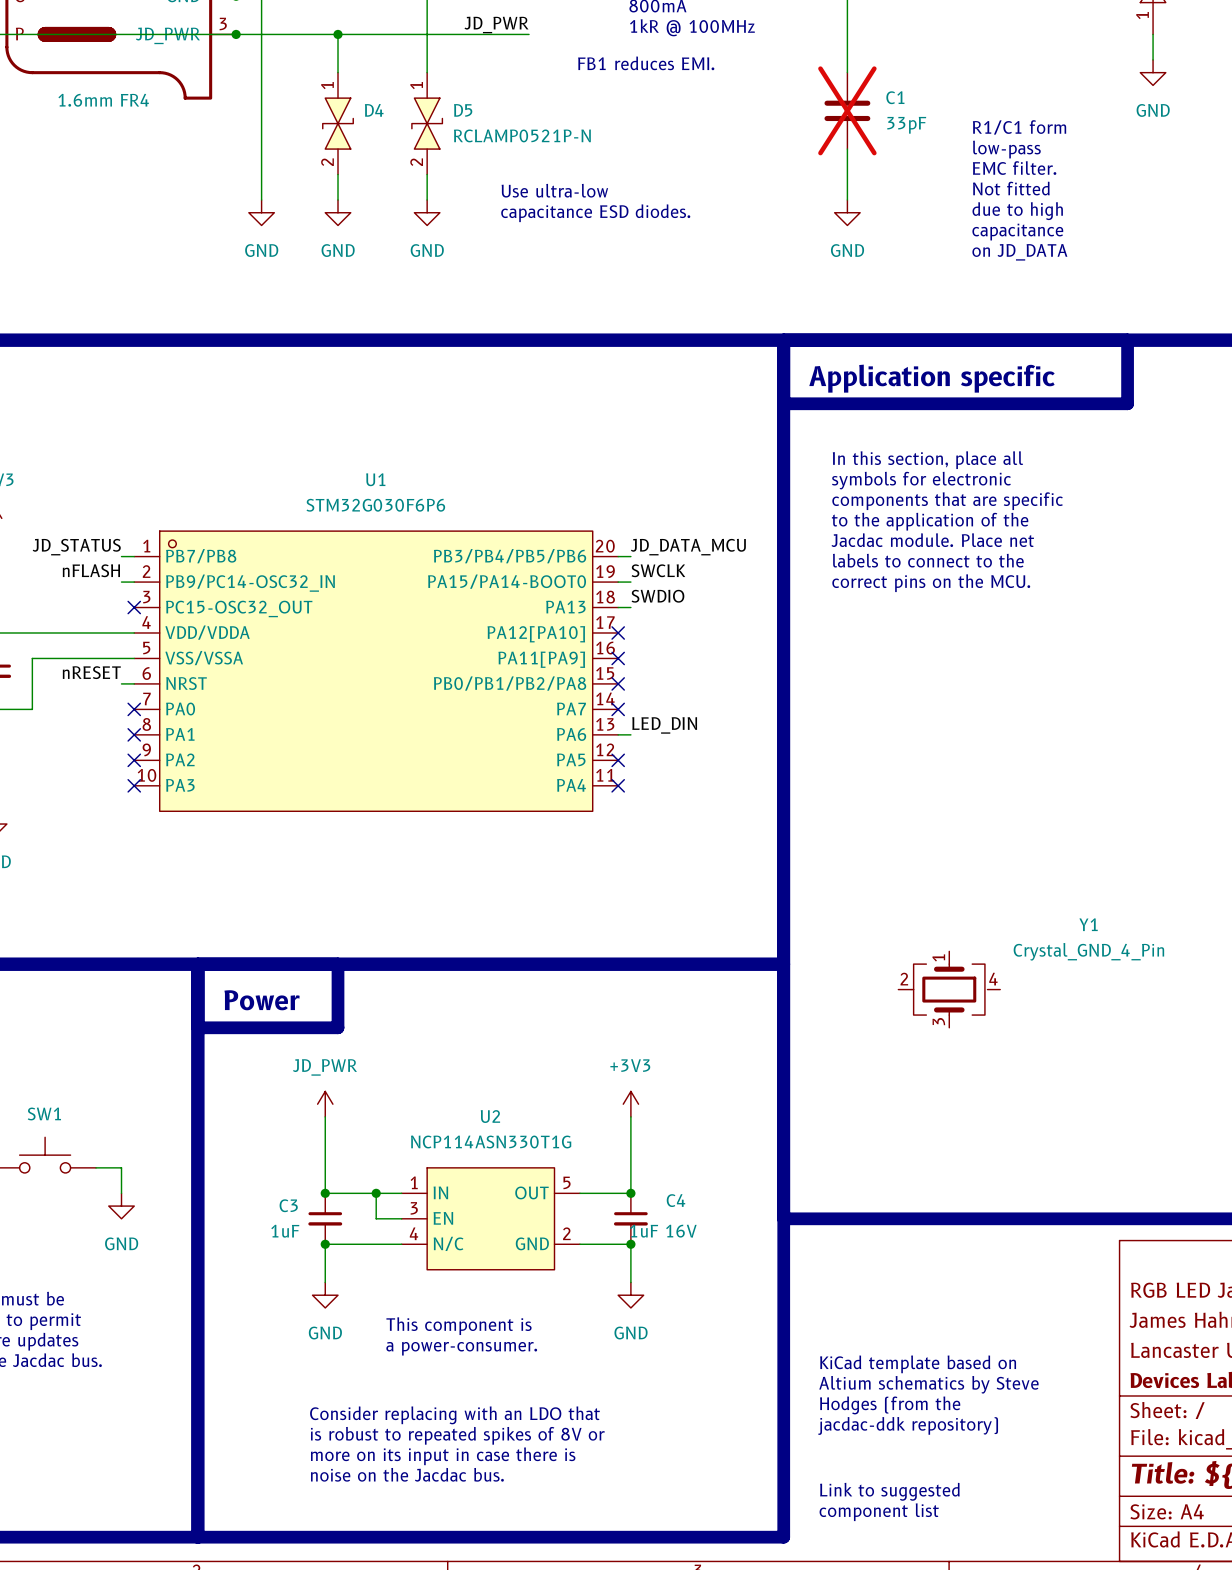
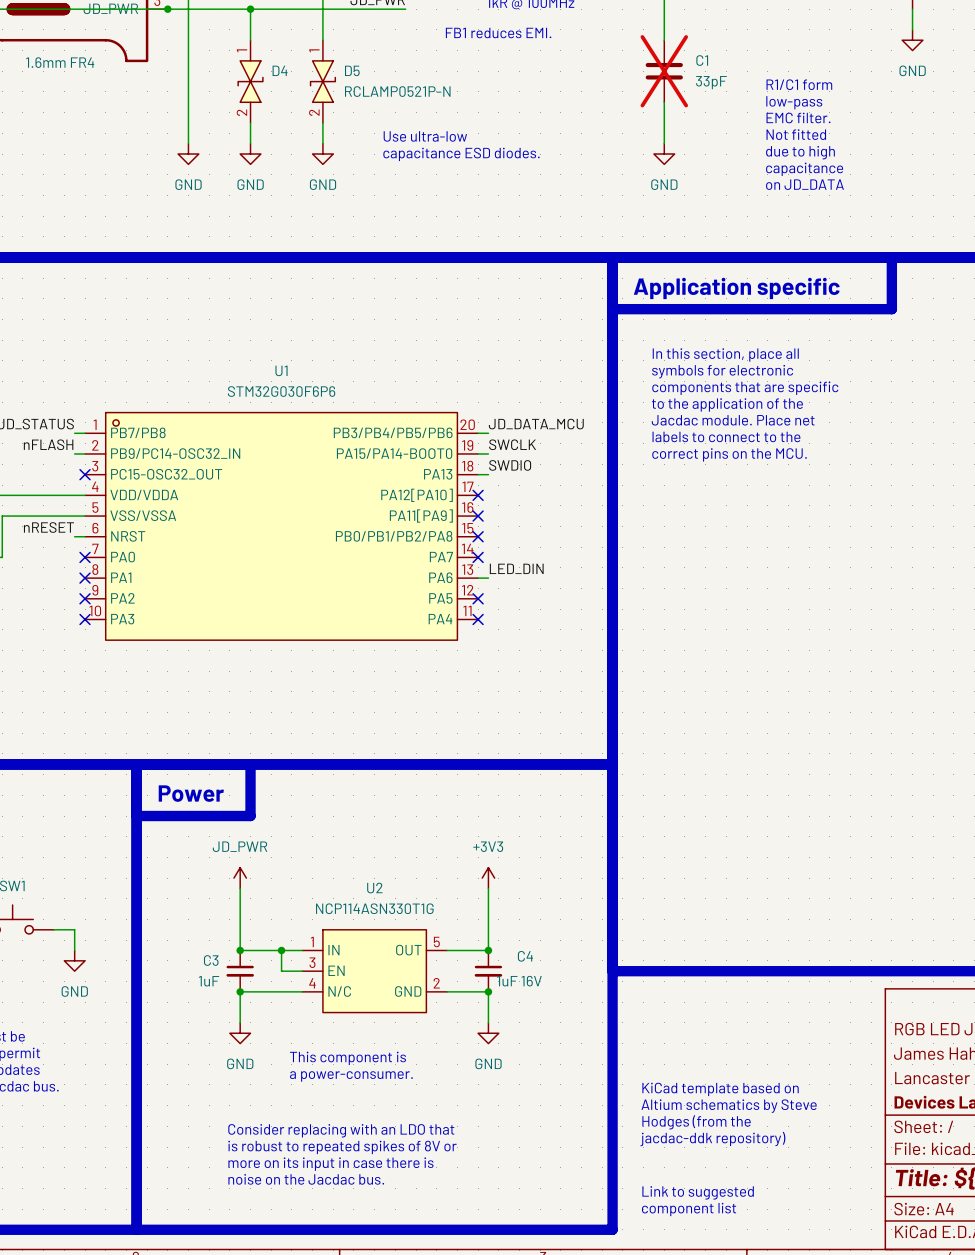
Y1: Crystal_GND_4_Pin (949, 989) -> none

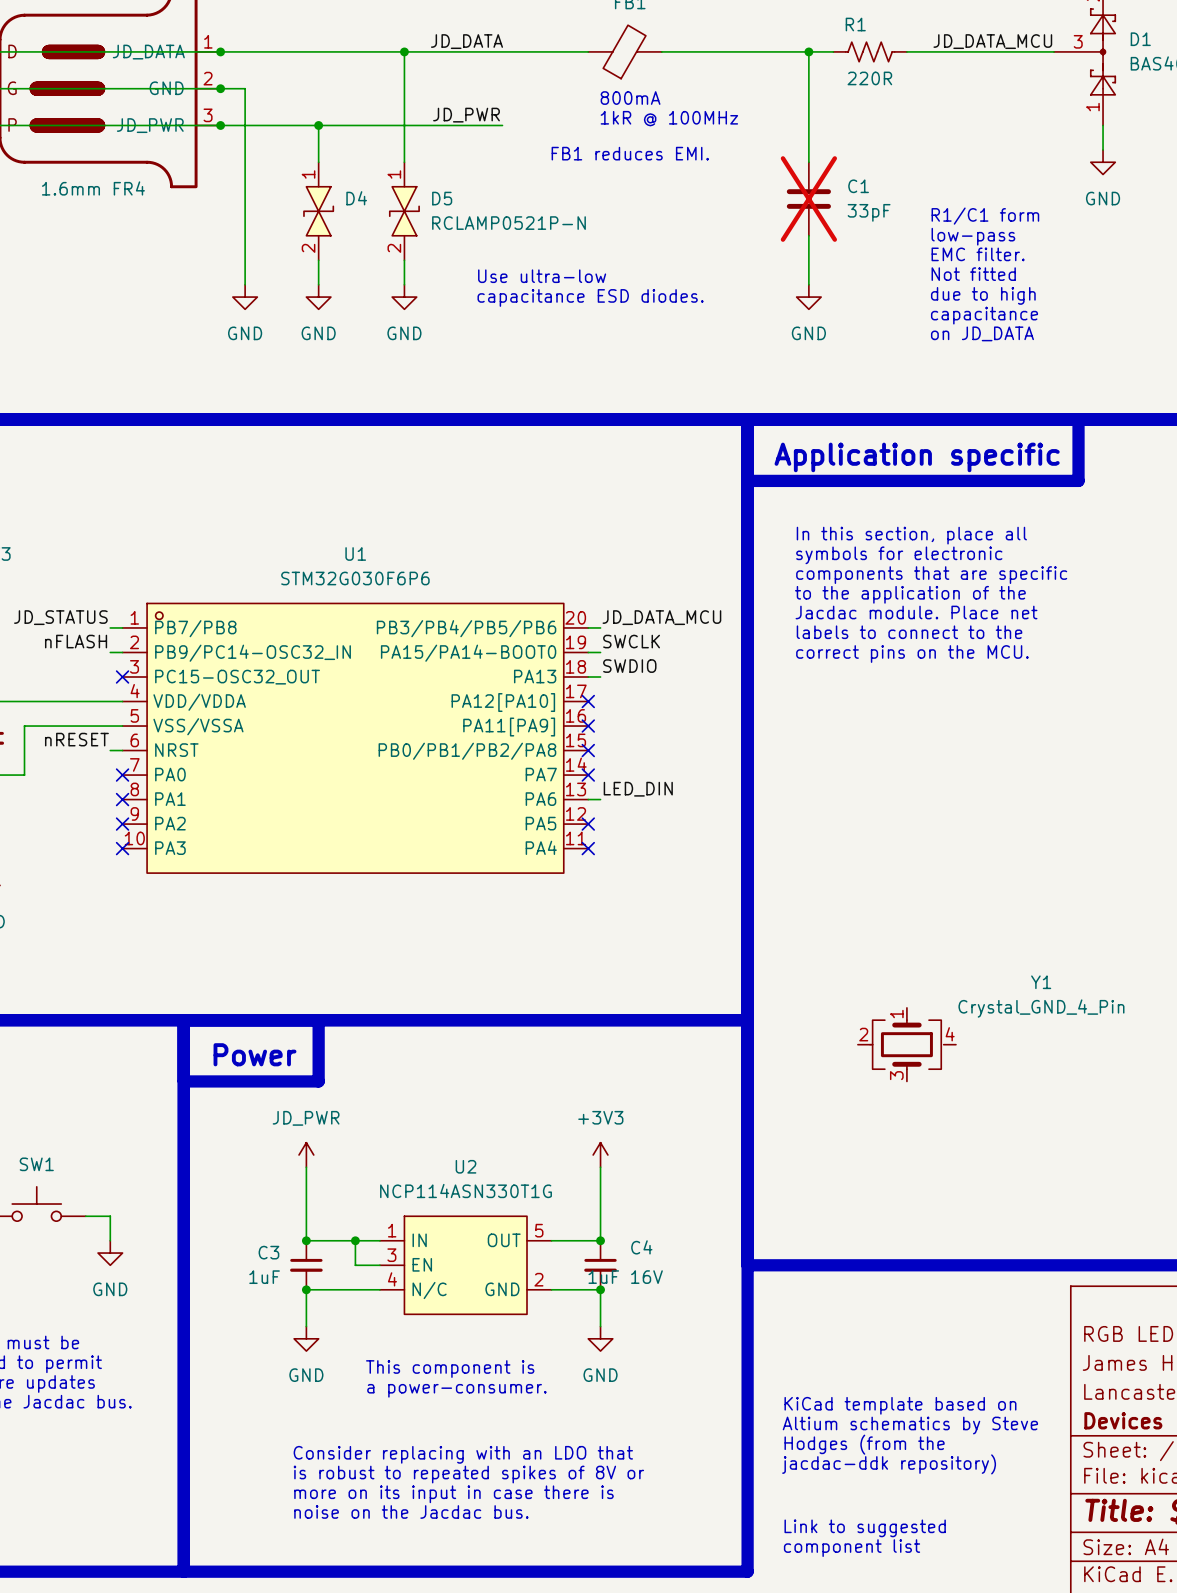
Y1: none -> Crystal_GND_4_Pin (906, 1044)

